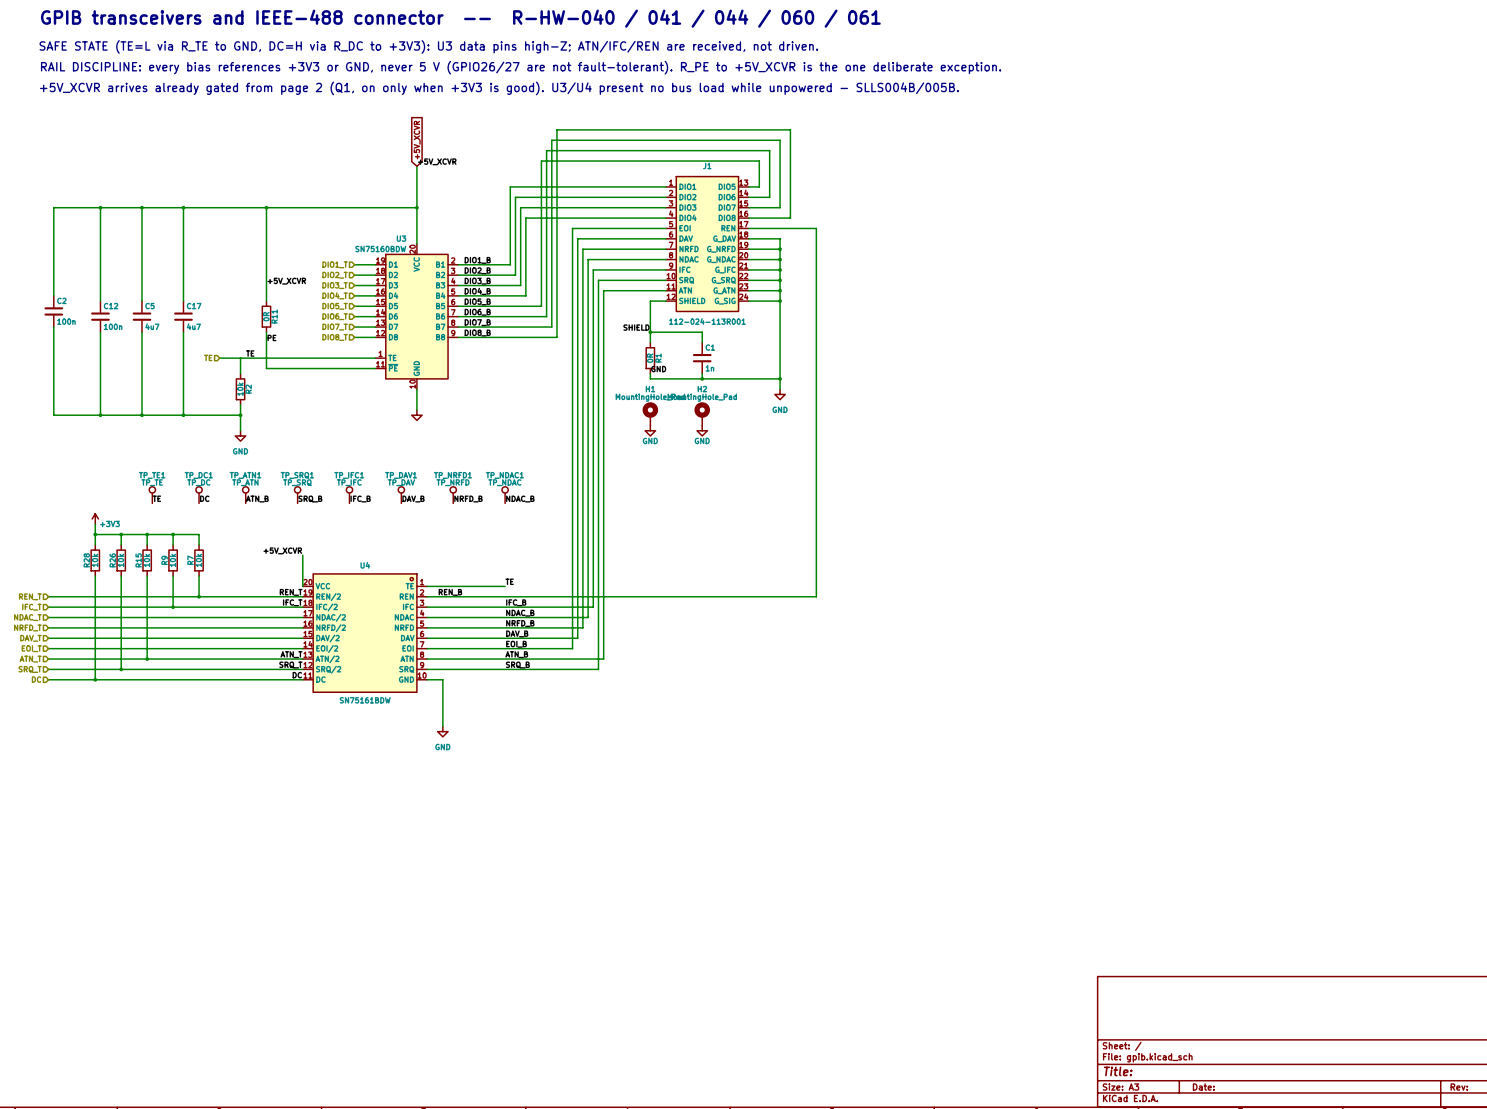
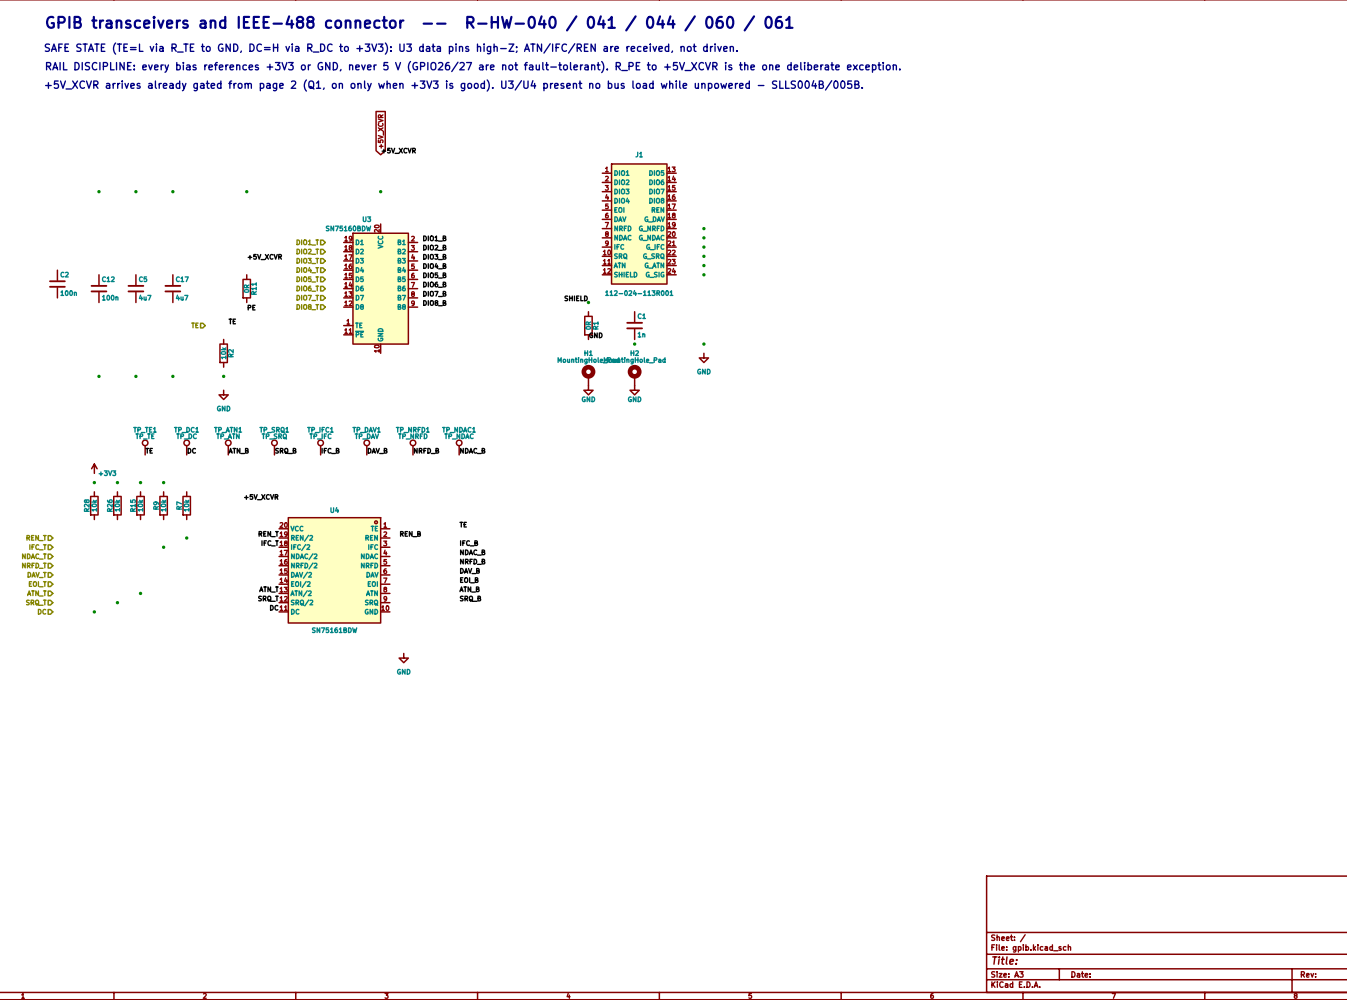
wire: (416, 166) (416, 244) -> none
wire: (665, 186) (510, 186) (510, 264) (458, 264) -> none
wire: (748, 186) (759, 186) (759, 161) (541, 161) (541, 306) (458, 306) -> none
wire: (665, 197) (515, 197) (515, 275) (458, 275) -> none
wire: (748, 197) (769, 197) (769, 150) (546, 150) (546, 316) (458, 316) -> none
wire: (100, 207) (100, 301) -> none
wire: (141, 207) (141, 301) -> none
wire: (183, 207) (183, 301) -> none
wire: (266, 207) (266, 301) -> none
wire: (416, 207) (53, 207) (53, 295) -> none
wire: (665, 207) (520, 207) (520, 285) (458, 285) -> none
wire: (748, 207) (780, 207) (780, 140) (551, 140) (551, 327) (458, 327) -> none
wire: (665, 218) (525, 218) (525, 295) (458, 295) -> none
wire: (748, 218) (790, 218) (790, 129) (556, 129) (556, 337) (458, 337) -> none
wire: (665, 228) (572, 228) (572, 648) (427, 648) -> none
wire: (748, 228) (816, 228) (816, 596) (427, 596) -> none
wire: (665, 238) (577, 238) (577, 638) (427, 638) -> none
wire: (748, 238) (780, 238) (780, 389) -> none
wire: (665, 249) (582, 249) (582, 627) (427, 627) -> none
wire: (748, 249) (780, 249) -> none
wire: (665, 259) (588, 259) (588, 617) (427, 617) -> none
wire: (748, 259) (780, 259) -> none
wire: (354, 264) (375, 264) -> none
wire: (665, 269) (593, 269) (593, 607) (427, 607) -> none
wire: (748, 269) (780, 269) -> none
wire: (354, 275) (375, 275) -> none
wire: (665, 280) (598, 280) (598, 669) (427, 669) -> none
wire: (748, 280) (780, 280) -> none
wire: (354, 285) (375, 285) -> none
wire: (665, 290) (603, 290) (603, 659) (427, 659) -> none
wire: (748, 290) (780, 290) -> none
wire: (354, 295) (375, 295) -> none
wire: (665, 301) (650, 301) (650, 342) -> none
wire: (748, 301) (780, 301) -> none
wire: (354, 306) (375, 306) -> none
wire: (354, 316) (375, 316) -> none
wire: (53, 327) (53, 415) (240, 415) -> none
wire: (354, 327) (375, 327) -> none
wire: (100, 332) (100, 415) -> none
wire: (141, 332) (141, 415) -> none
wire: (183, 332) (183, 415) -> none
wire: (266, 332) (266, 368) (375, 368) -> none
wire: (650, 332) (702, 332) (702, 342) -> none
wire: (354, 337) (375, 337) -> none
wire: (219, 358) (375, 358) -> none
wire: (240, 358) (240, 373) -> none
wire: (650, 373) (650, 378) (780, 378) -> none
wire: (702, 373) (702, 378) -> none
wire: (416, 389) (416, 410) -> none
wire: (240, 404) (240, 430) -> none
power symbol: (416, 415) -> none
wire: (95, 524) (95, 544) -> none
wire: (95, 534) (199, 534) (199, 544) -> none
wire: (121, 534) (121, 544) -> none
wire: (147, 534) (147, 544) -> none
wire: (173, 534) (173, 544) -> none
wire: (302, 555) (302, 586) -> none
wire: (95, 576) (95, 679) -> none
wire: (121, 576) (121, 669) -> none
wire: (147, 576) (147, 659) -> none
wire: (173, 576) (173, 607) -> none
wire: (199, 576) (199, 596) -> none
wire: (427, 586) (505, 586) -> none
wire: (48, 596) (302, 596) -> none
wire: (48, 607) (302, 607) -> none
wire: (48, 617) (302, 617) -> none
wire: (48, 627) (302, 627) -> none
wire: (48, 638) (302, 638) -> none
wire: (48, 648) (302, 648) -> none
wire: (48, 659) (302, 659) -> none
wire: (48, 669) (302, 669) -> none
wire: (48, 679) (302, 679) -> none
wire: (427, 679) (442, 679) (442, 726) -> none

